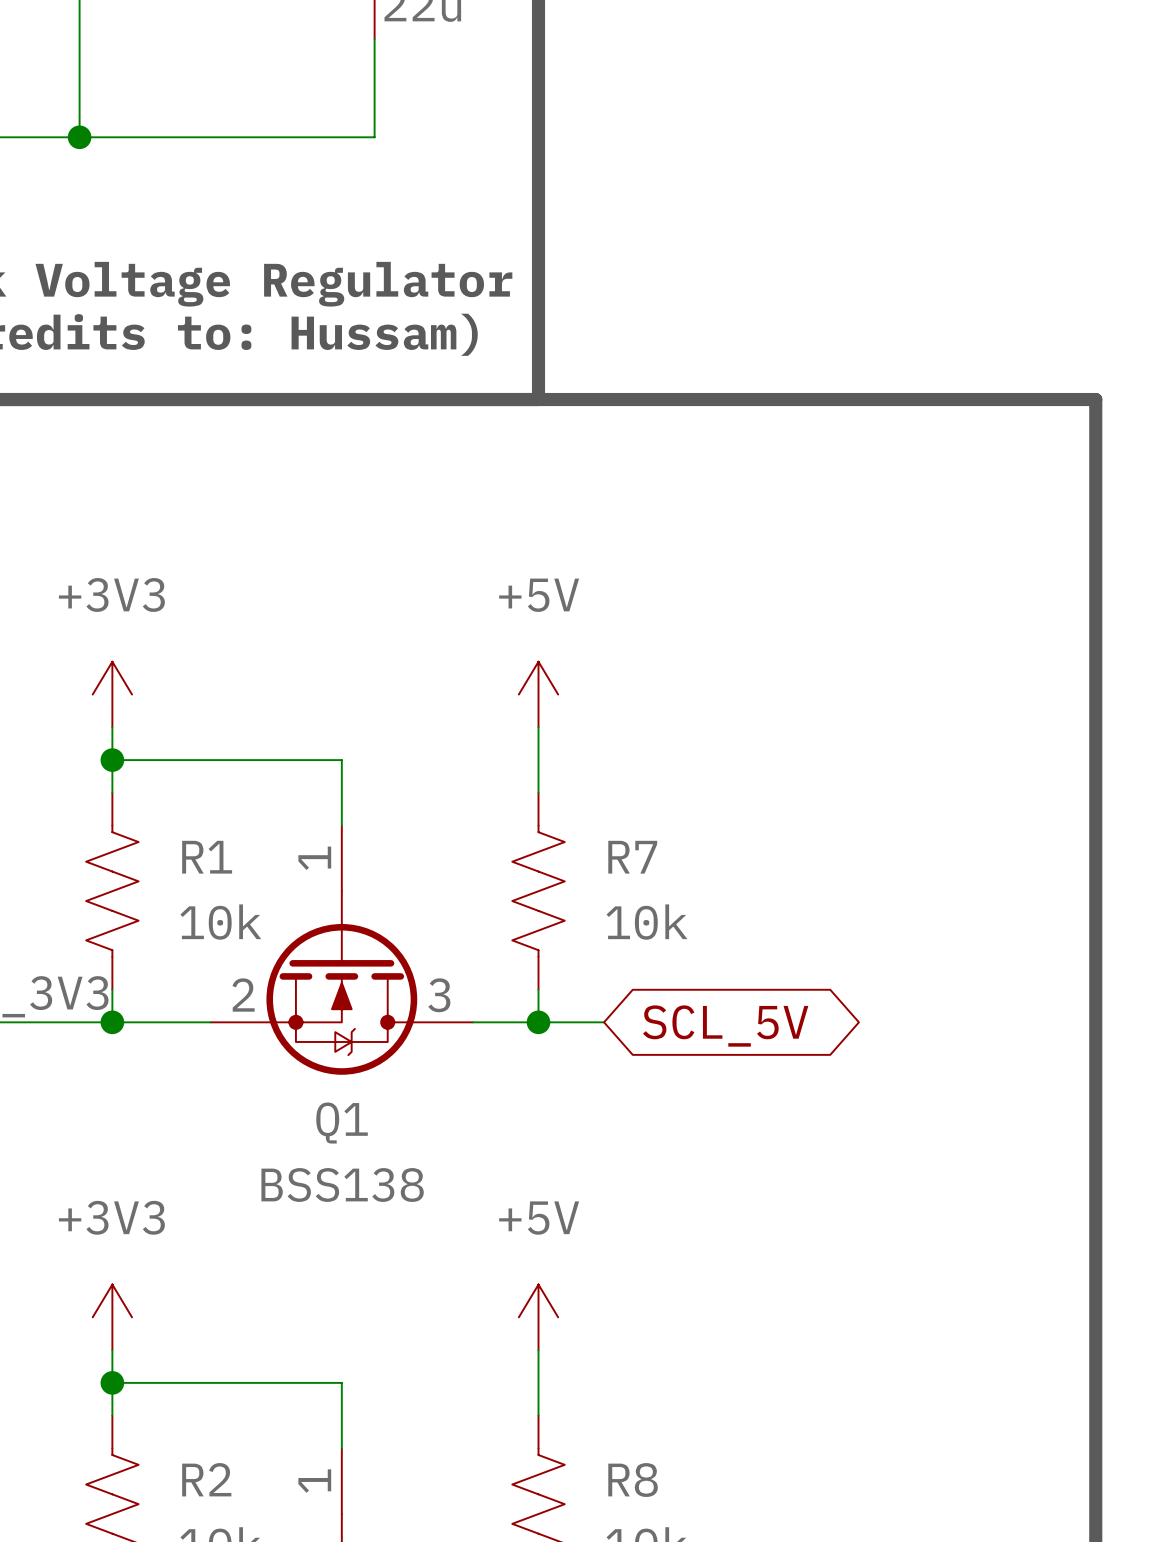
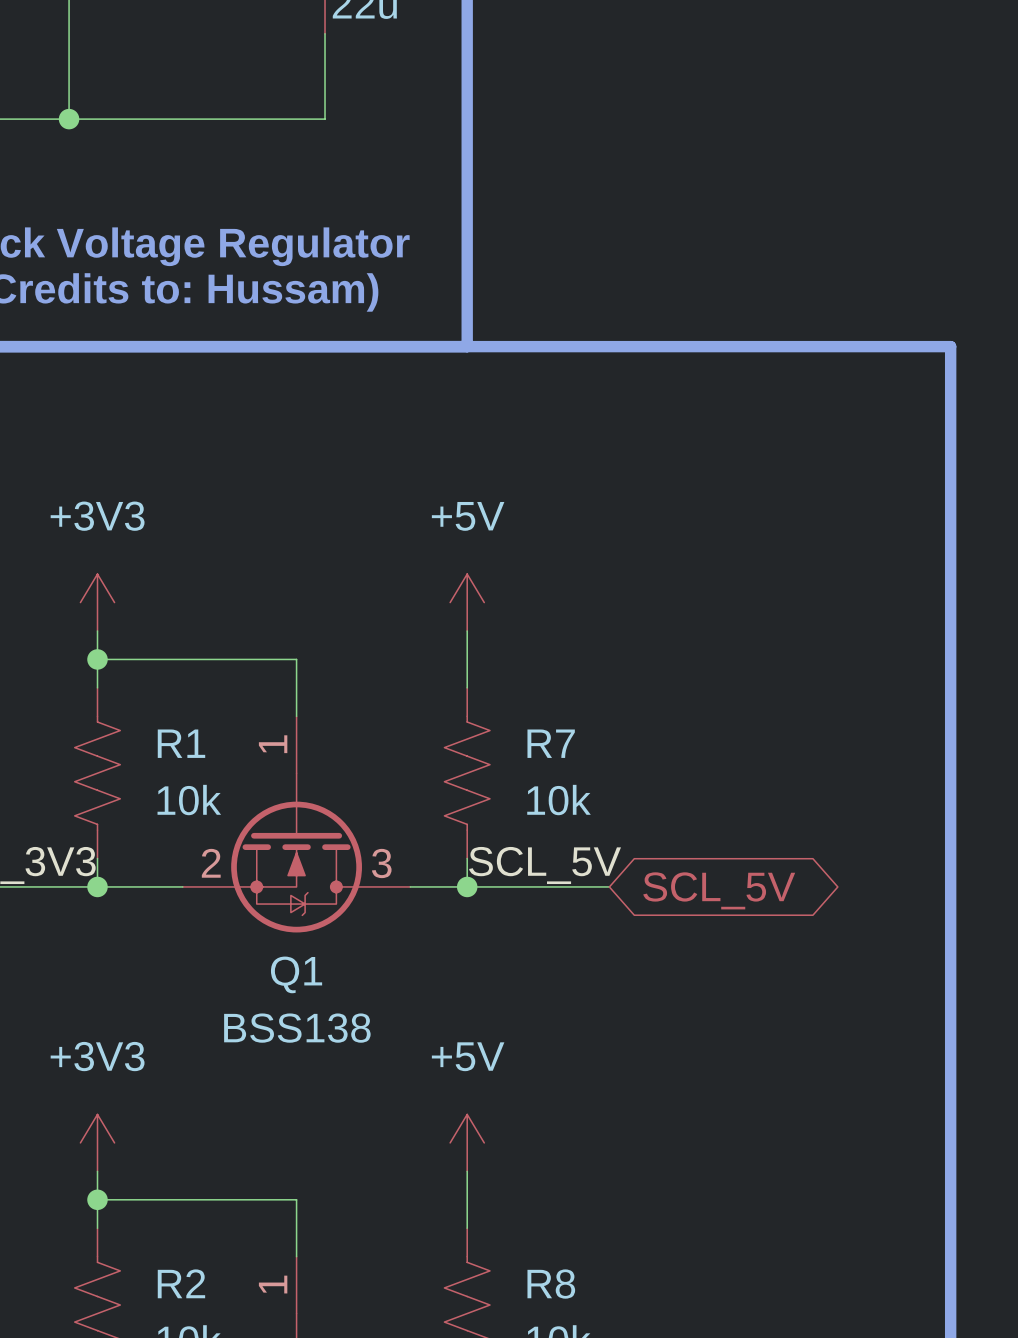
label: none -> SCL_5V (545, 865)
wire: none -> (524, 886) (609, 886)
global label position: SCL_5V (725, 1026) -> SCL_5V (719, 890)

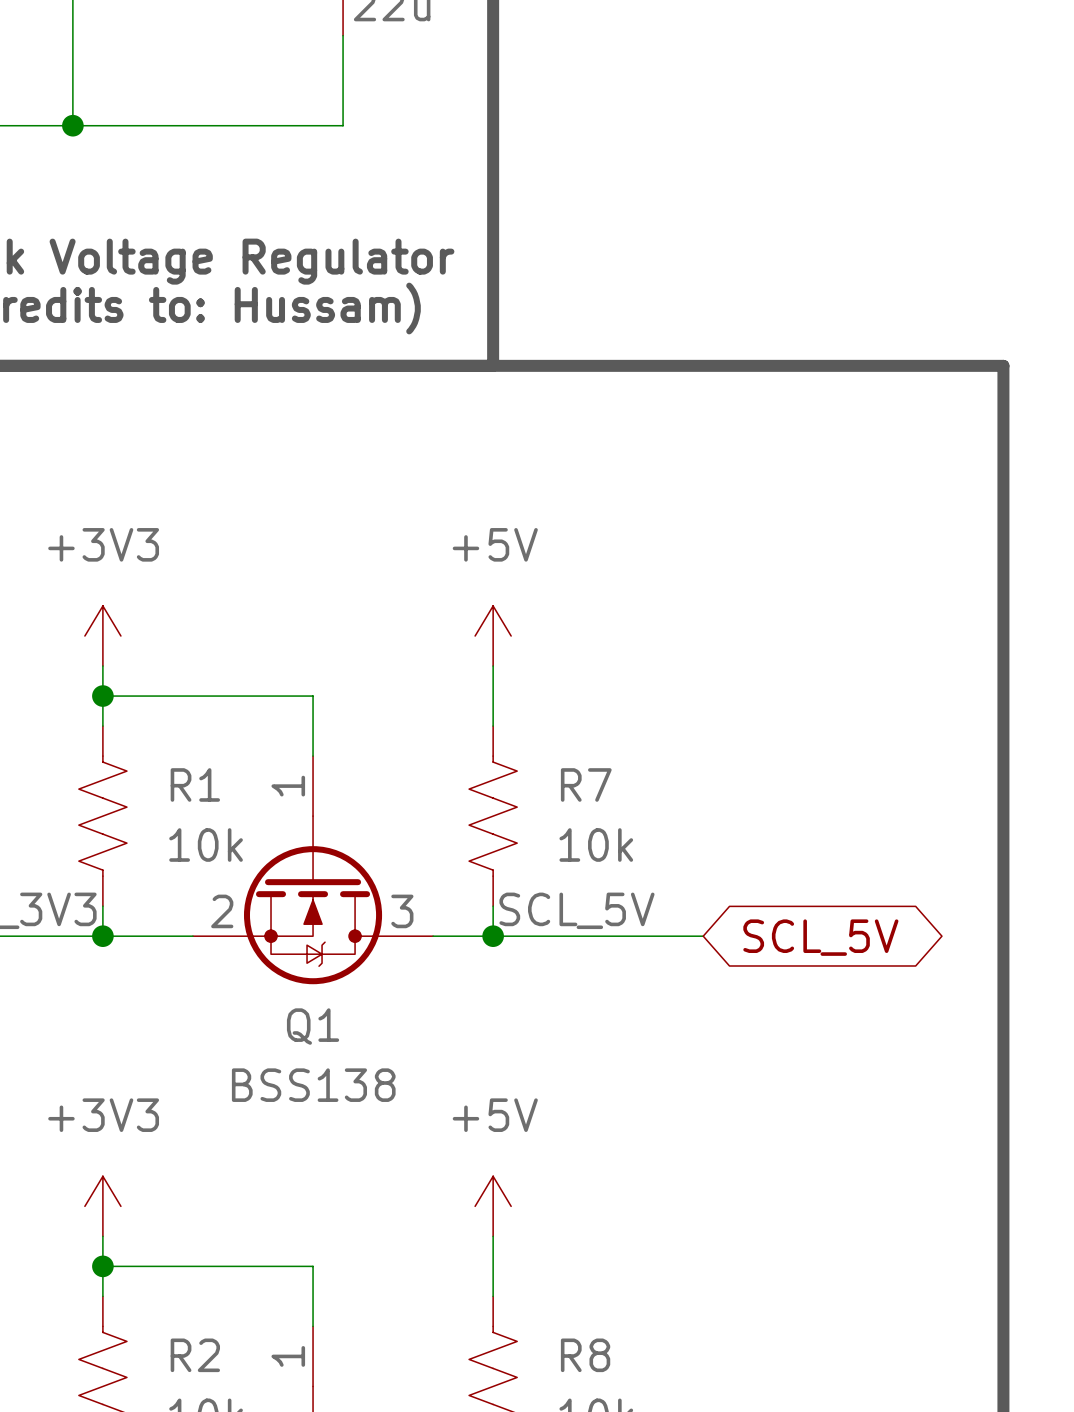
wire: none -> (643, 936) (703, 936)
global label position: SCL_5V (719, 890) -> SCL_5V (820, 937)

